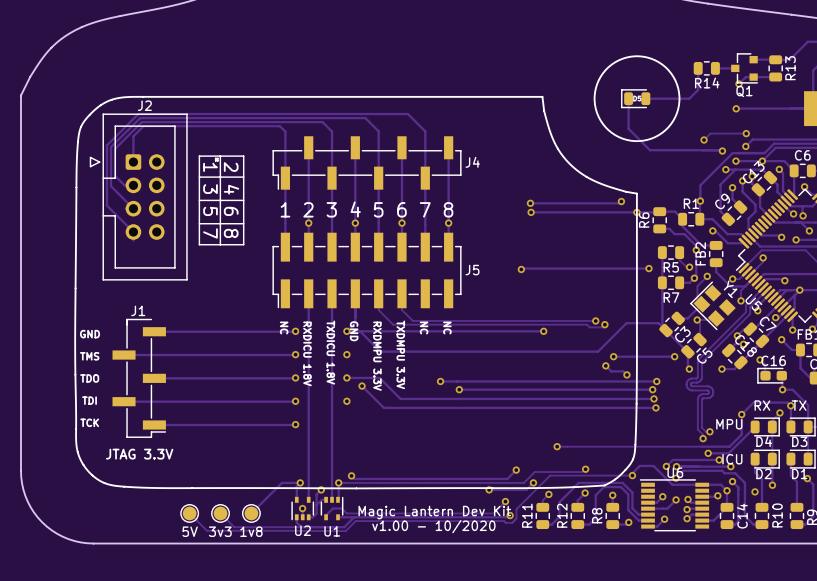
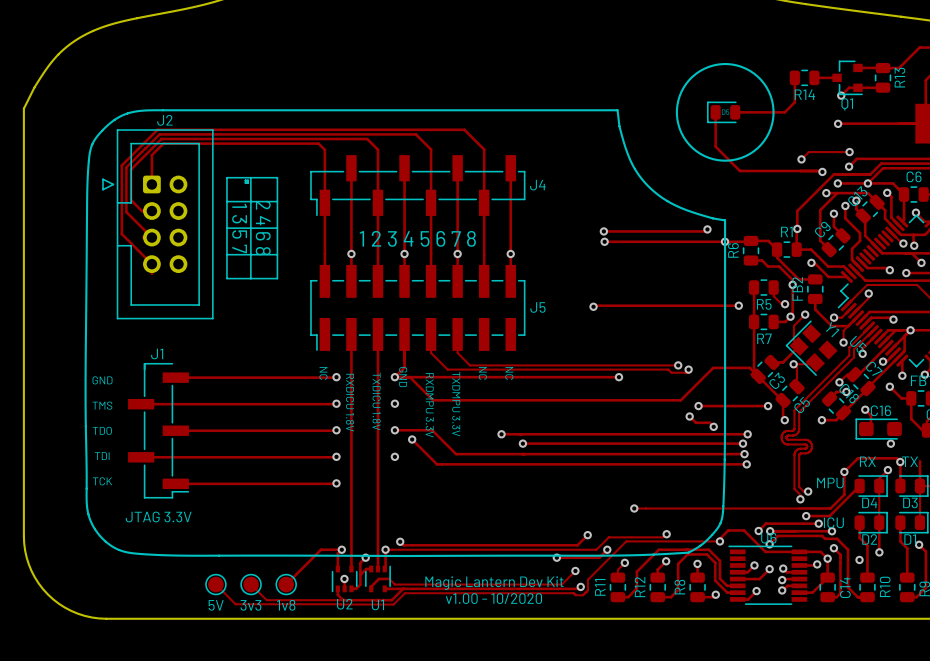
C16 footprint: [757, 367, 787, 384] -> [855, 418, 902, 440]
track: (782, 375) (782, 389) (792, 389) (808, 405) -> none

